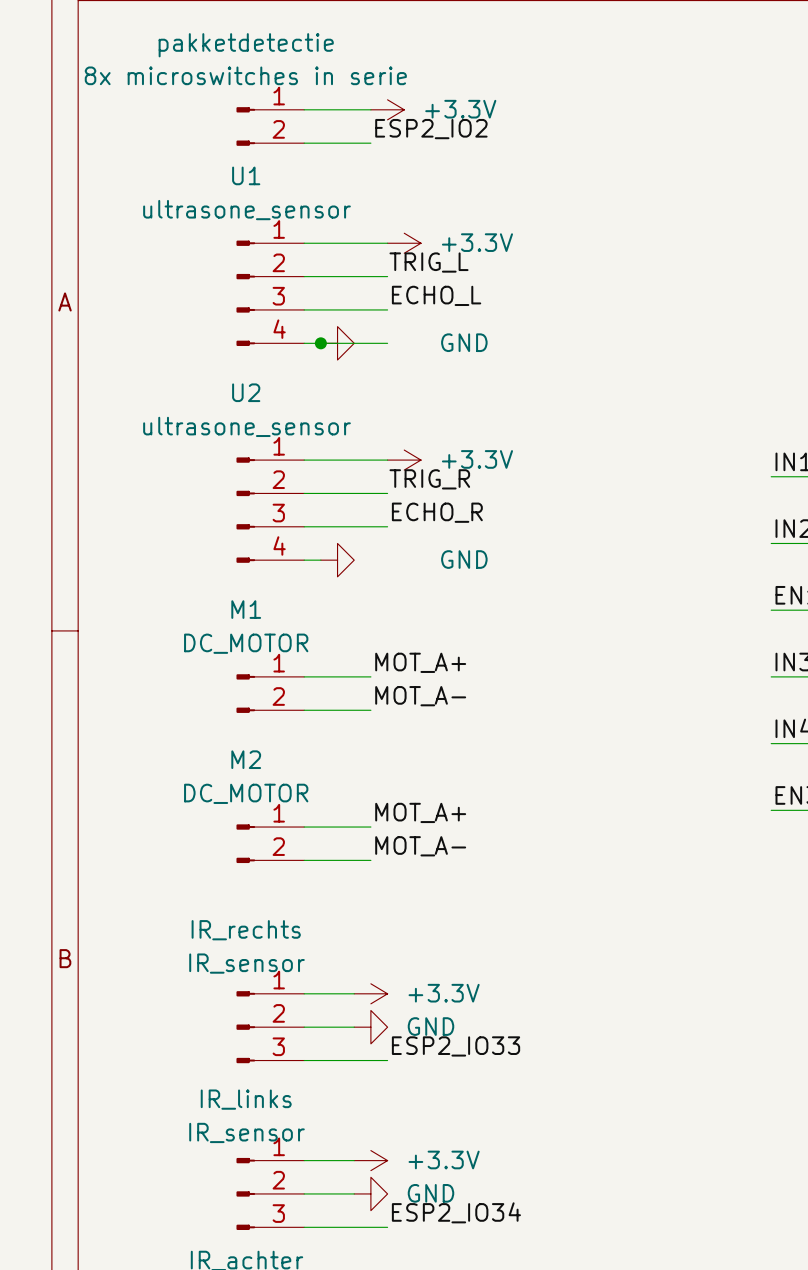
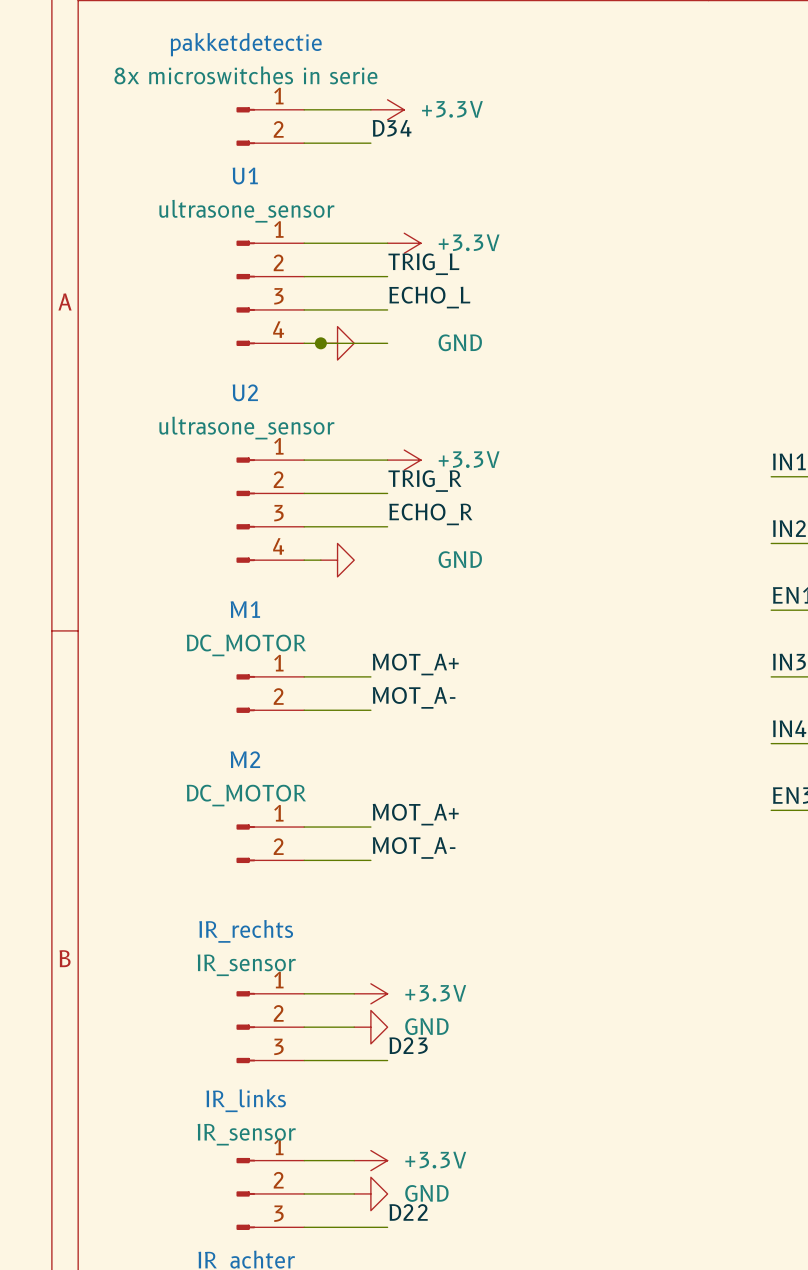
label: ESP2_IO2 (431, 129) -> D34 (392, 128)
label: ESP2_IO33 (456, 1046) -> D23 (408, 1045)
label: ESP2_IO34 (456, 1212) -> D22 (408, 1212)

